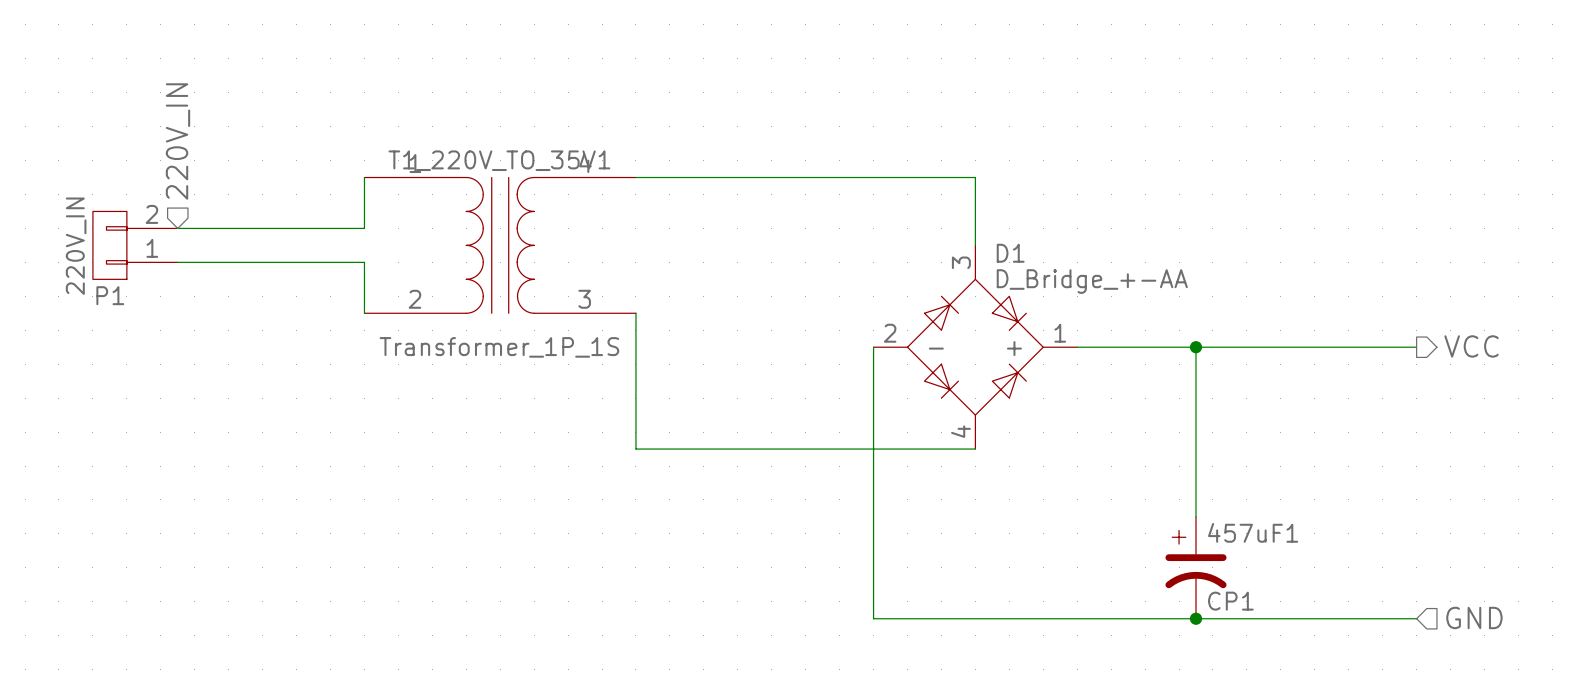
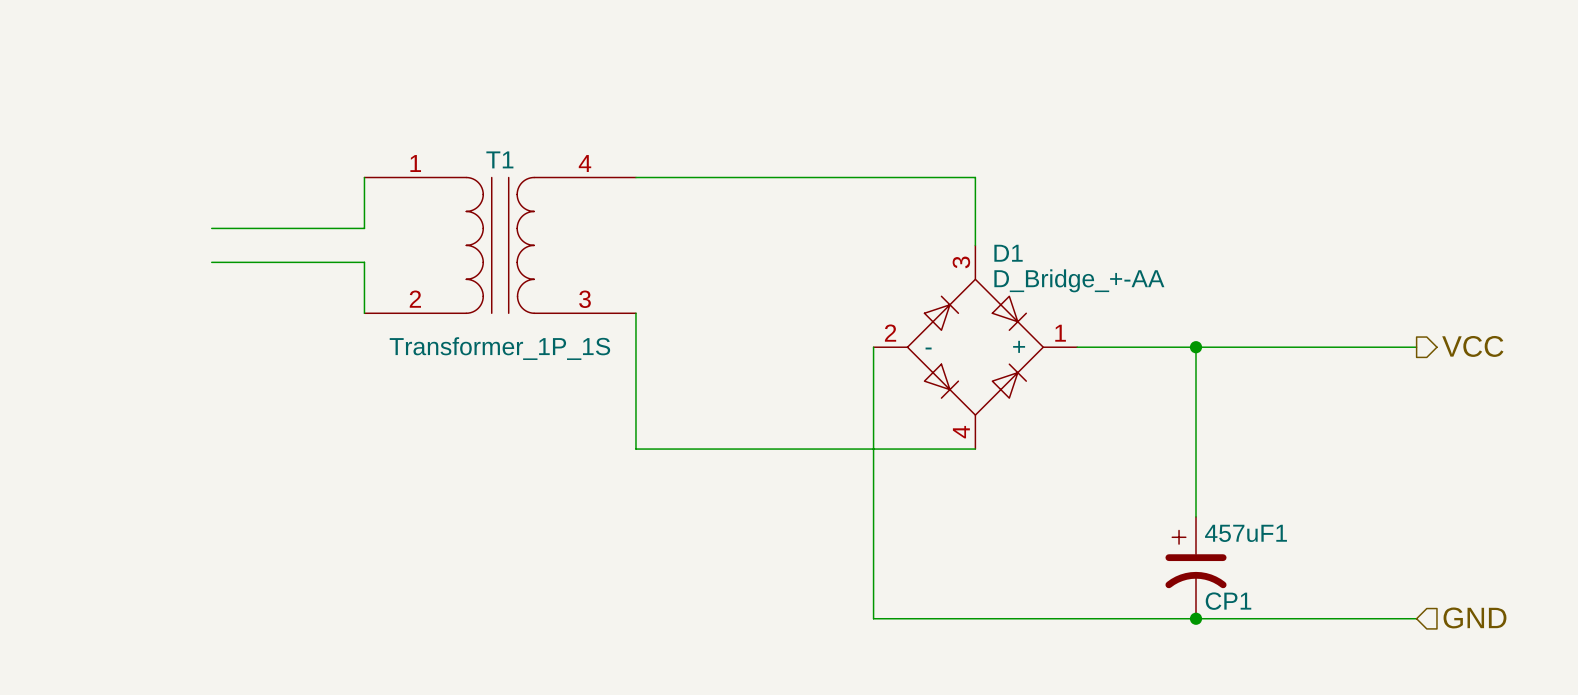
hierarchical label: 220V_IN (177, 141) -> none
T1_220V_TO_35V1 name: T1_220V_TO_35V1 (499, 160) -> T1 (499, 159)
wire: (177, 228) (211, 228) -> none
P1: 220V_IN (135, 245) -> none
wire: (177, 262) (211, 262) -> none

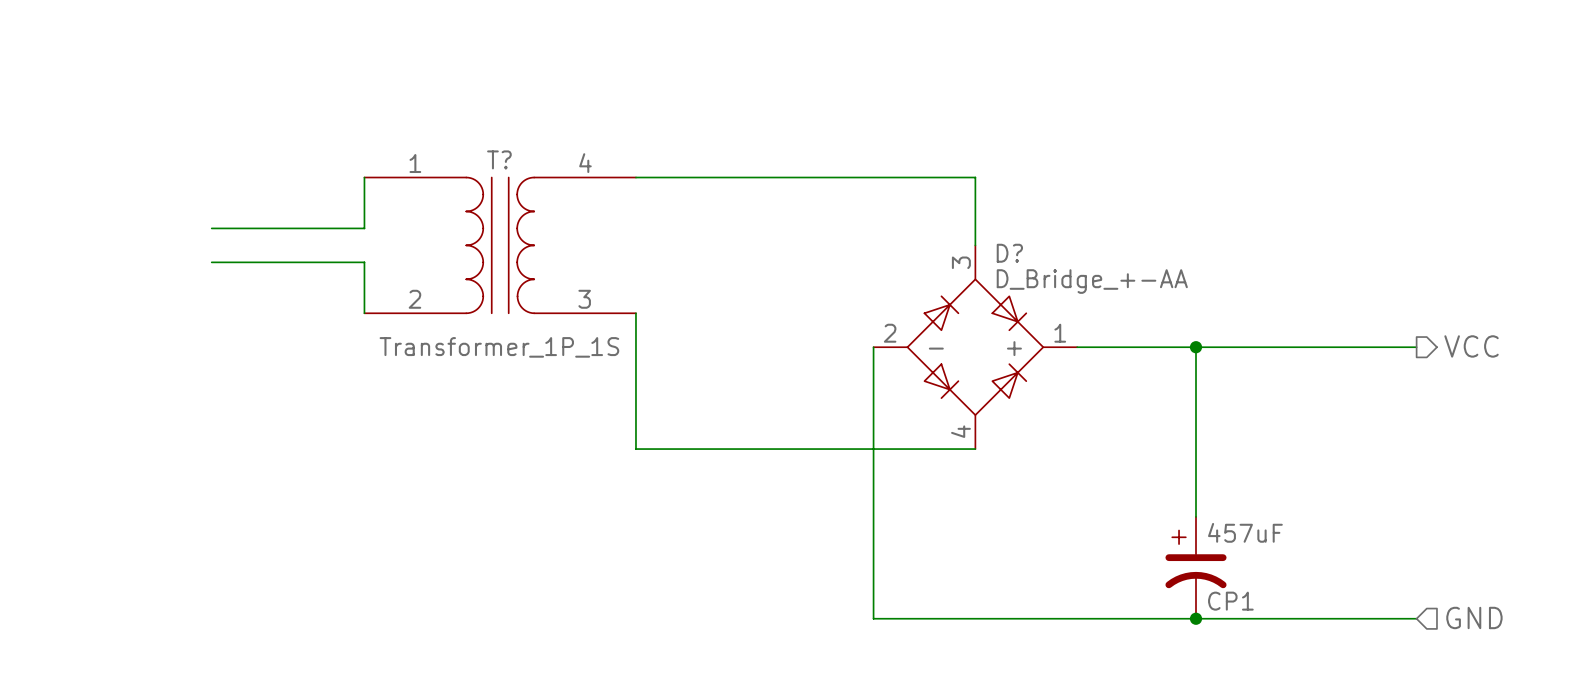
T1 name: T1 (499, 159) -> T? (499, 159)
D1 name: D1 (1008, 253) -> D? (1009, 253)
457uF1 name: 457uF1 (1246, 533) -> 457uF (1245, 532)

